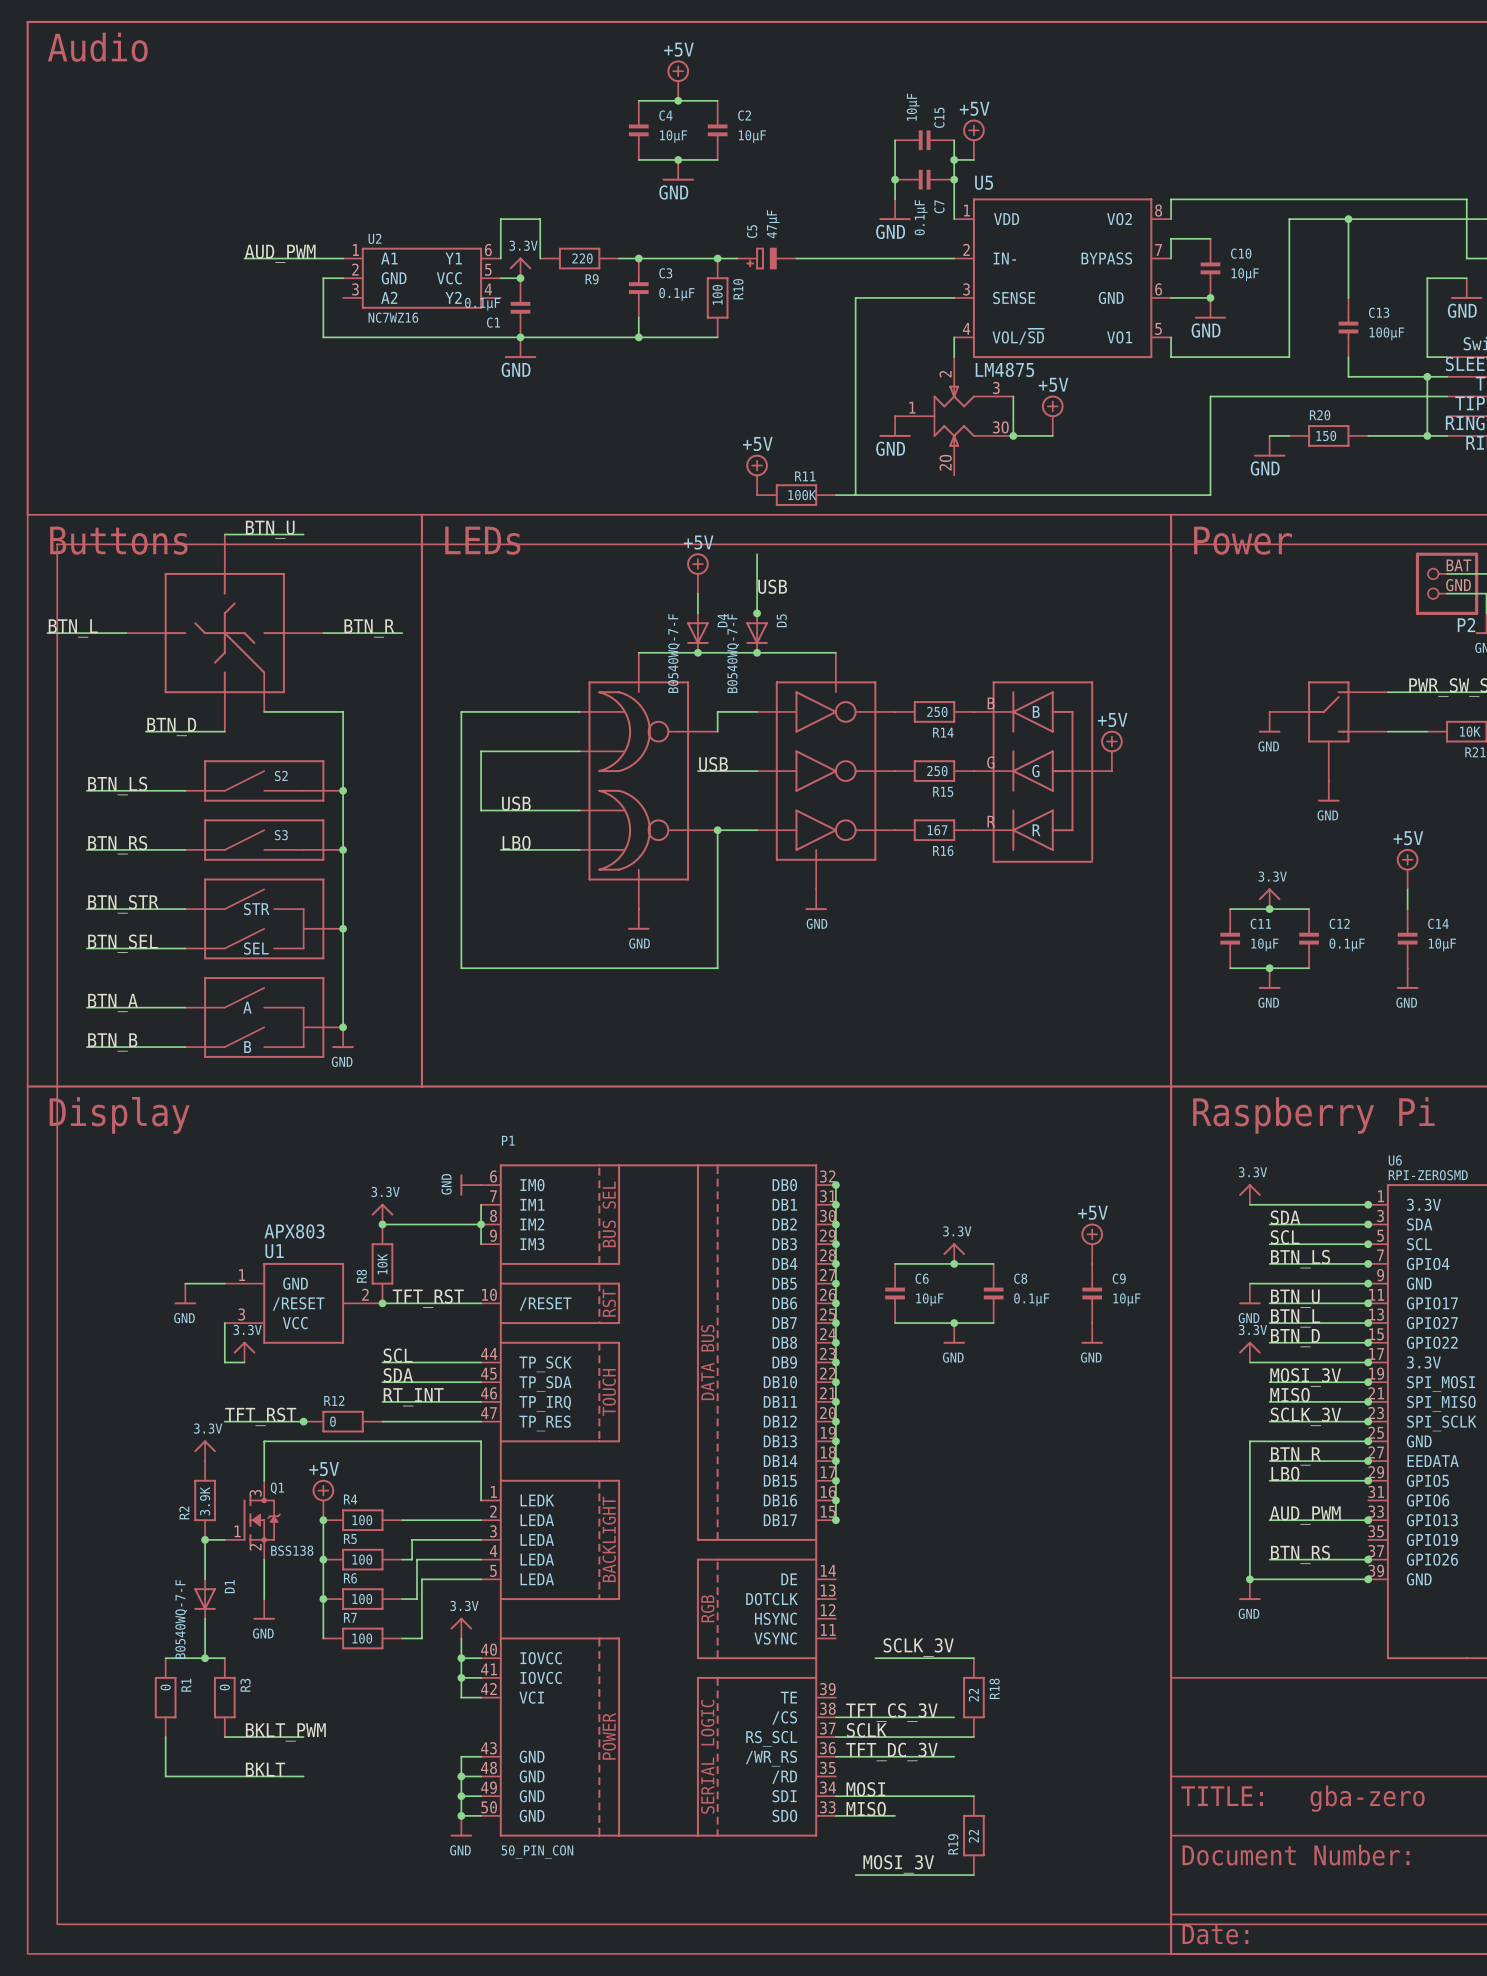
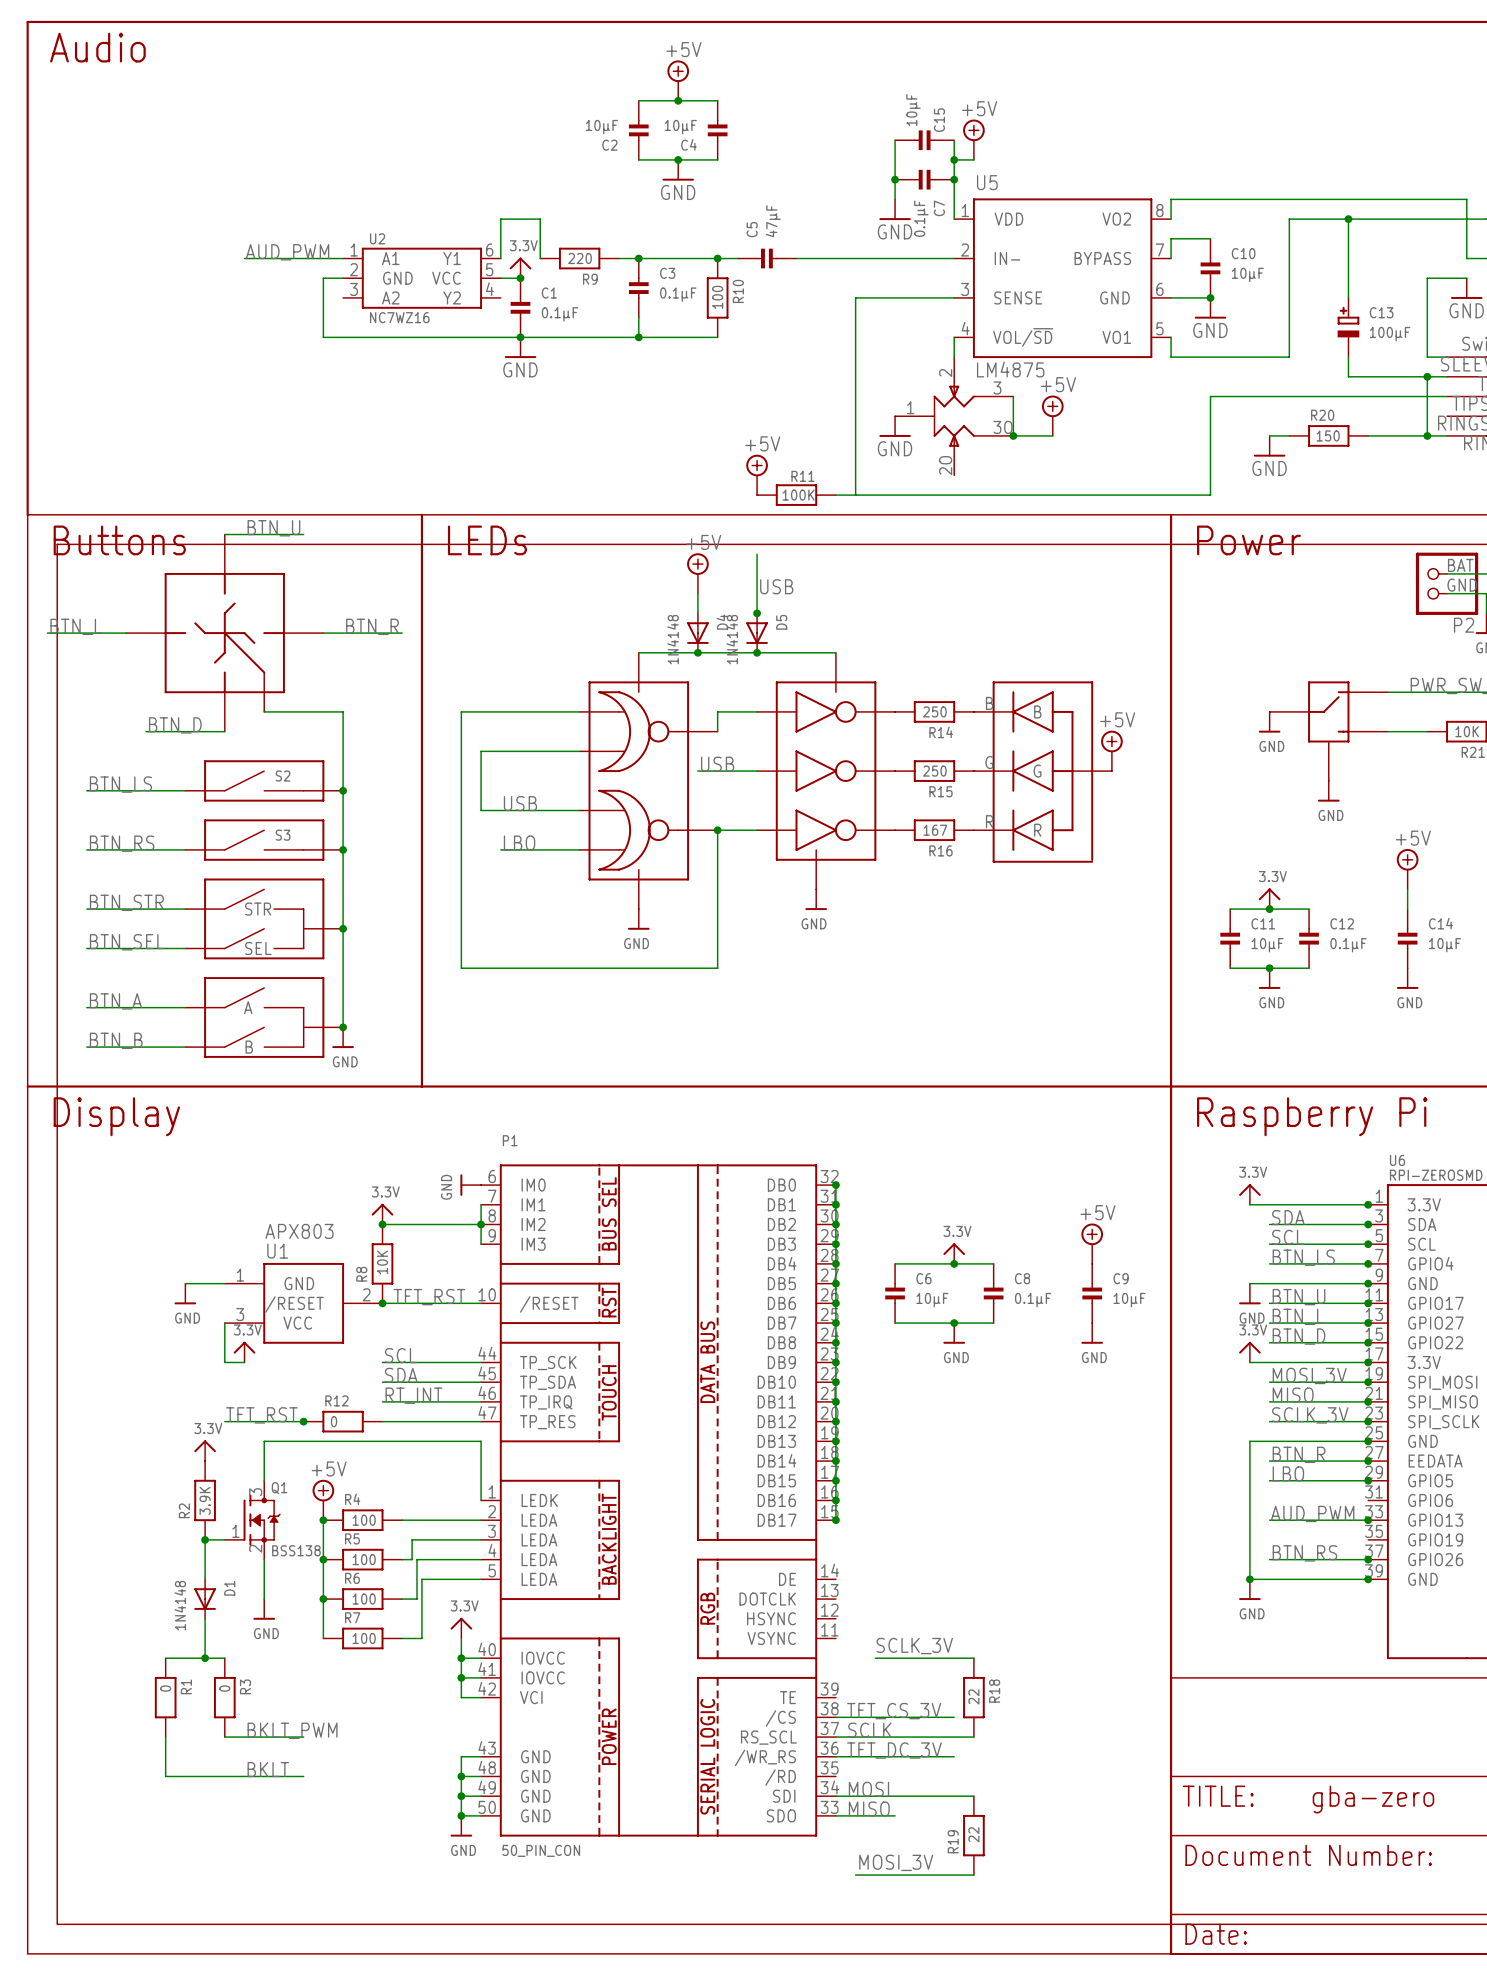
C4 name: C4 (665, 115) -> C2 (609, 145)
C2 name: C2 (744, 115) -> C4 (688, 144)
C4 value position: 10μF (673, 136) -> 10μF (601, 127)
C2 value position: 10μF (752, 136) -> 10μF (680, 127)
C5 symbol: [737, 247, 797, 270] -> [737, 248, 797, 269]
C13 symbol: [1338, 297, 1359, 358] -> [1337, 297, 1360, 358]
C1 value position: 0.1μF (482, 304) -> 0.1μF (559, 314)
C1 name position: C1 (493, 322) -> C1 (549, 293)
D4 value: B0540WQ-7-F (674, 653) -> 1N4148 (673, 639)
D5 value: B0540WQ-7-F (733, 653) -> 1N4148 (732, 639)
D1 value: B0540WQ-7-F (181, 1619) -> 1N4148 (180, 1605)

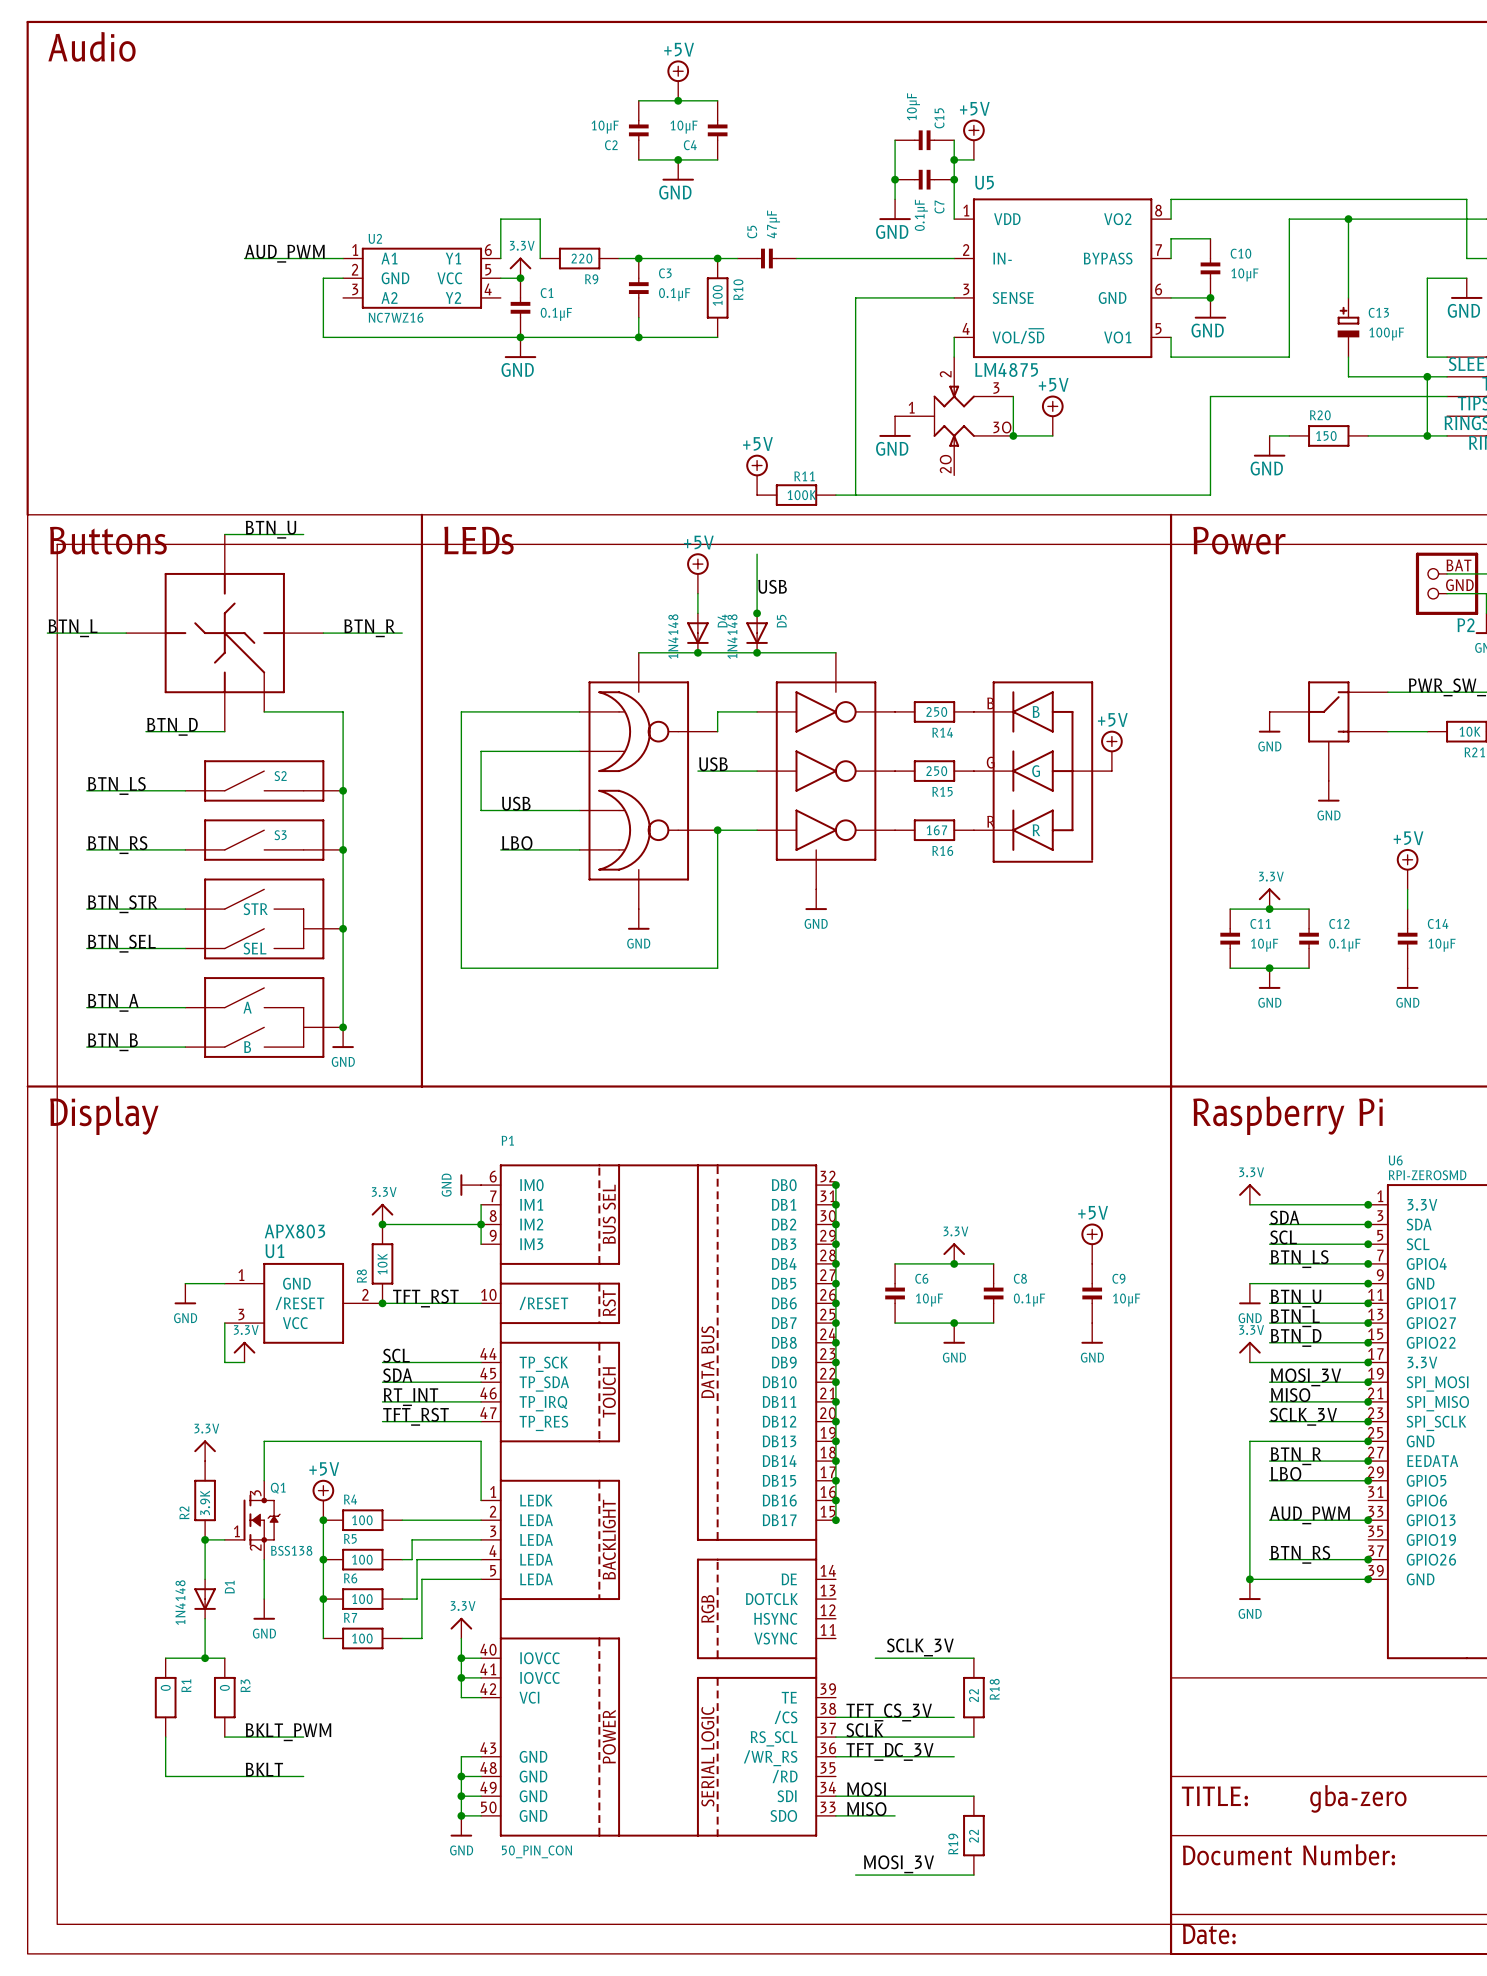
label position: TFT_RST (261, 1415) -> TFT_RST (415, 1416)
wire: (224, 1421) (303, 1421) -> none
junction: (303, 1421) -> none
R12: 0 (343, 1421) -> none

